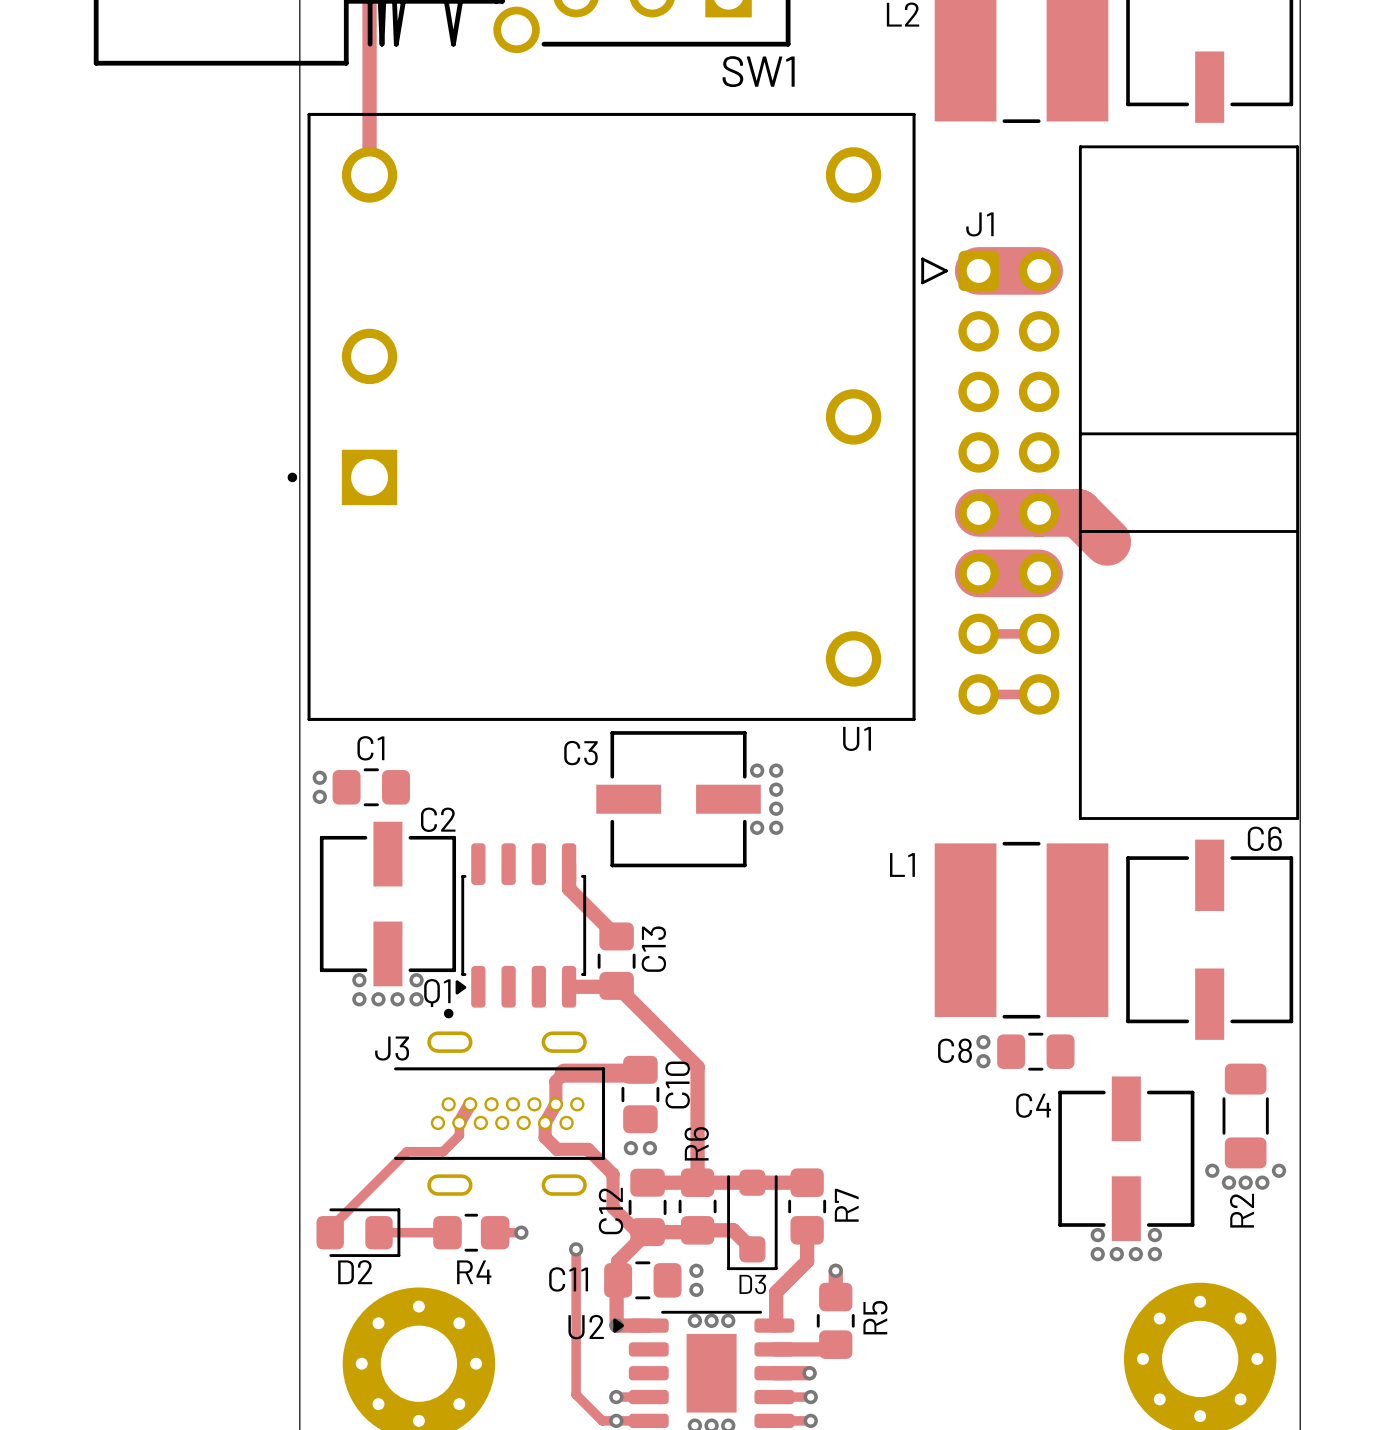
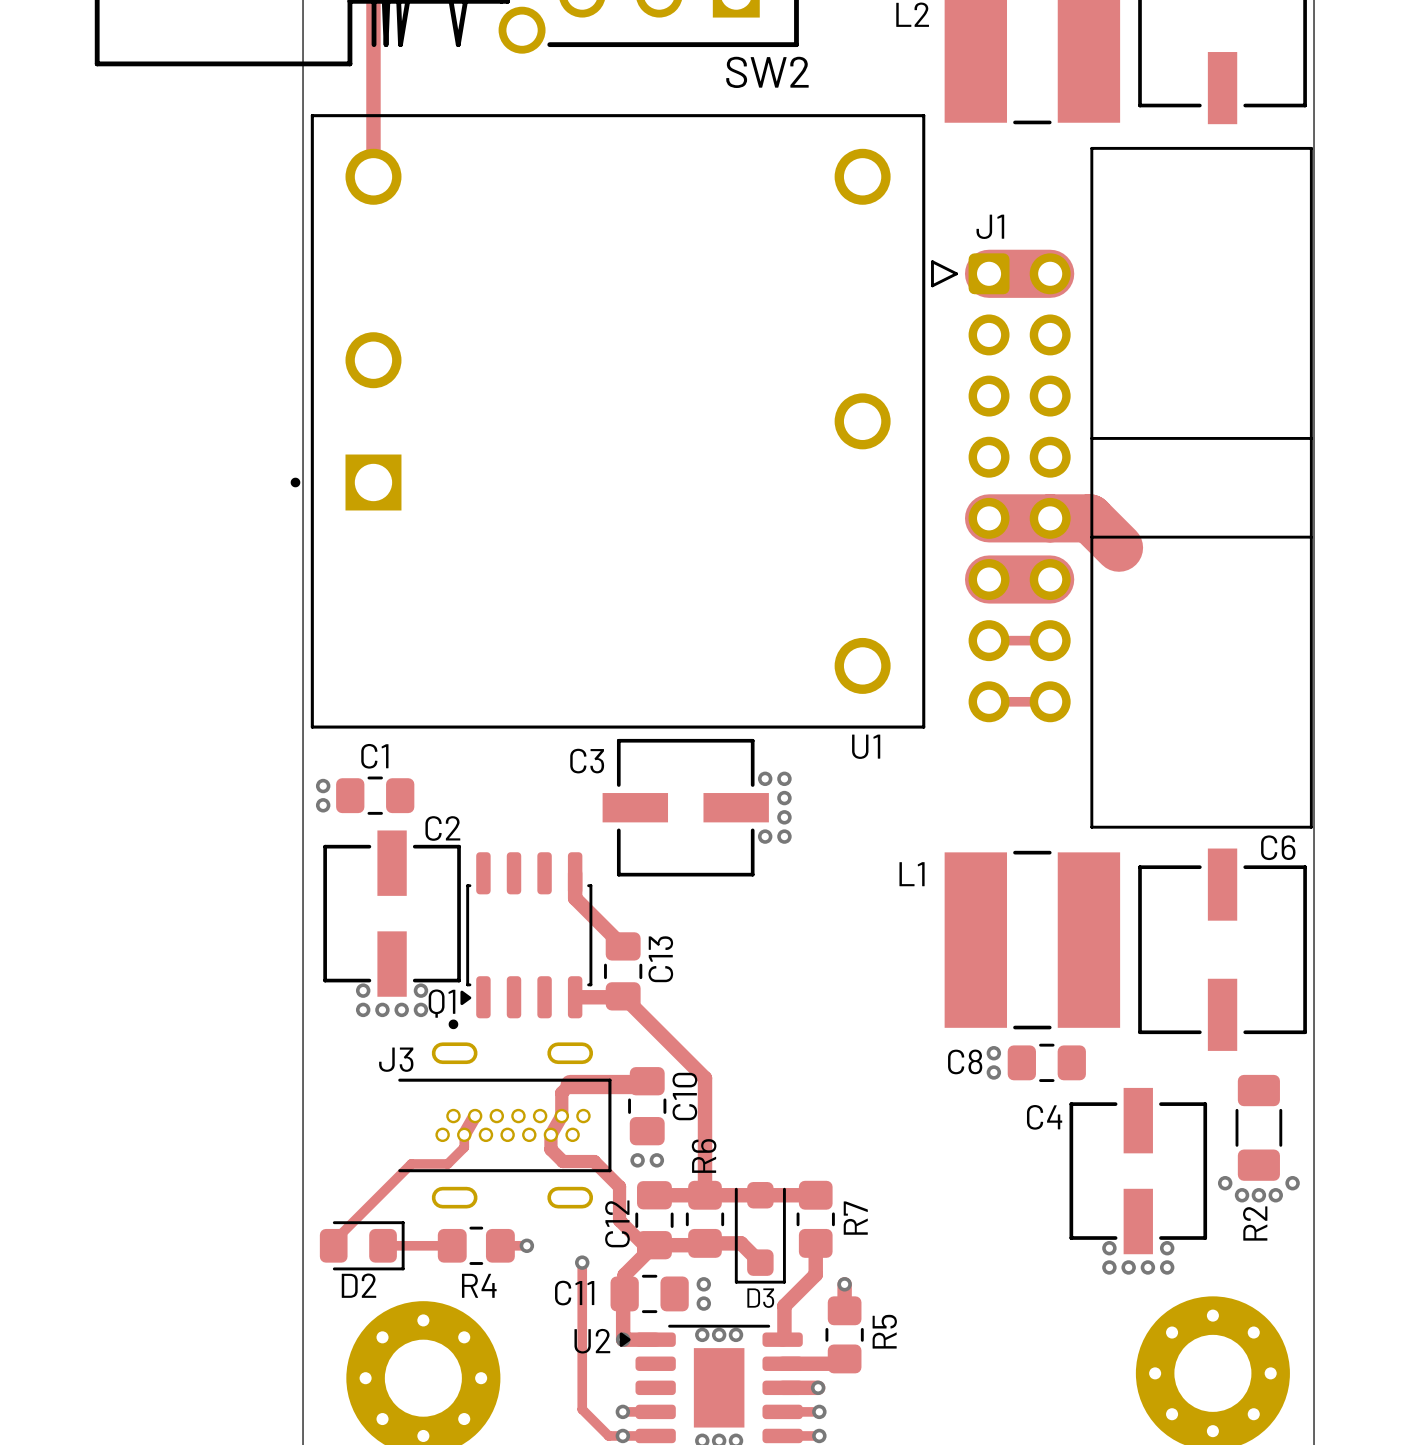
SW1 name: SW1 (758, 71) -> SW2 (767, 72)

